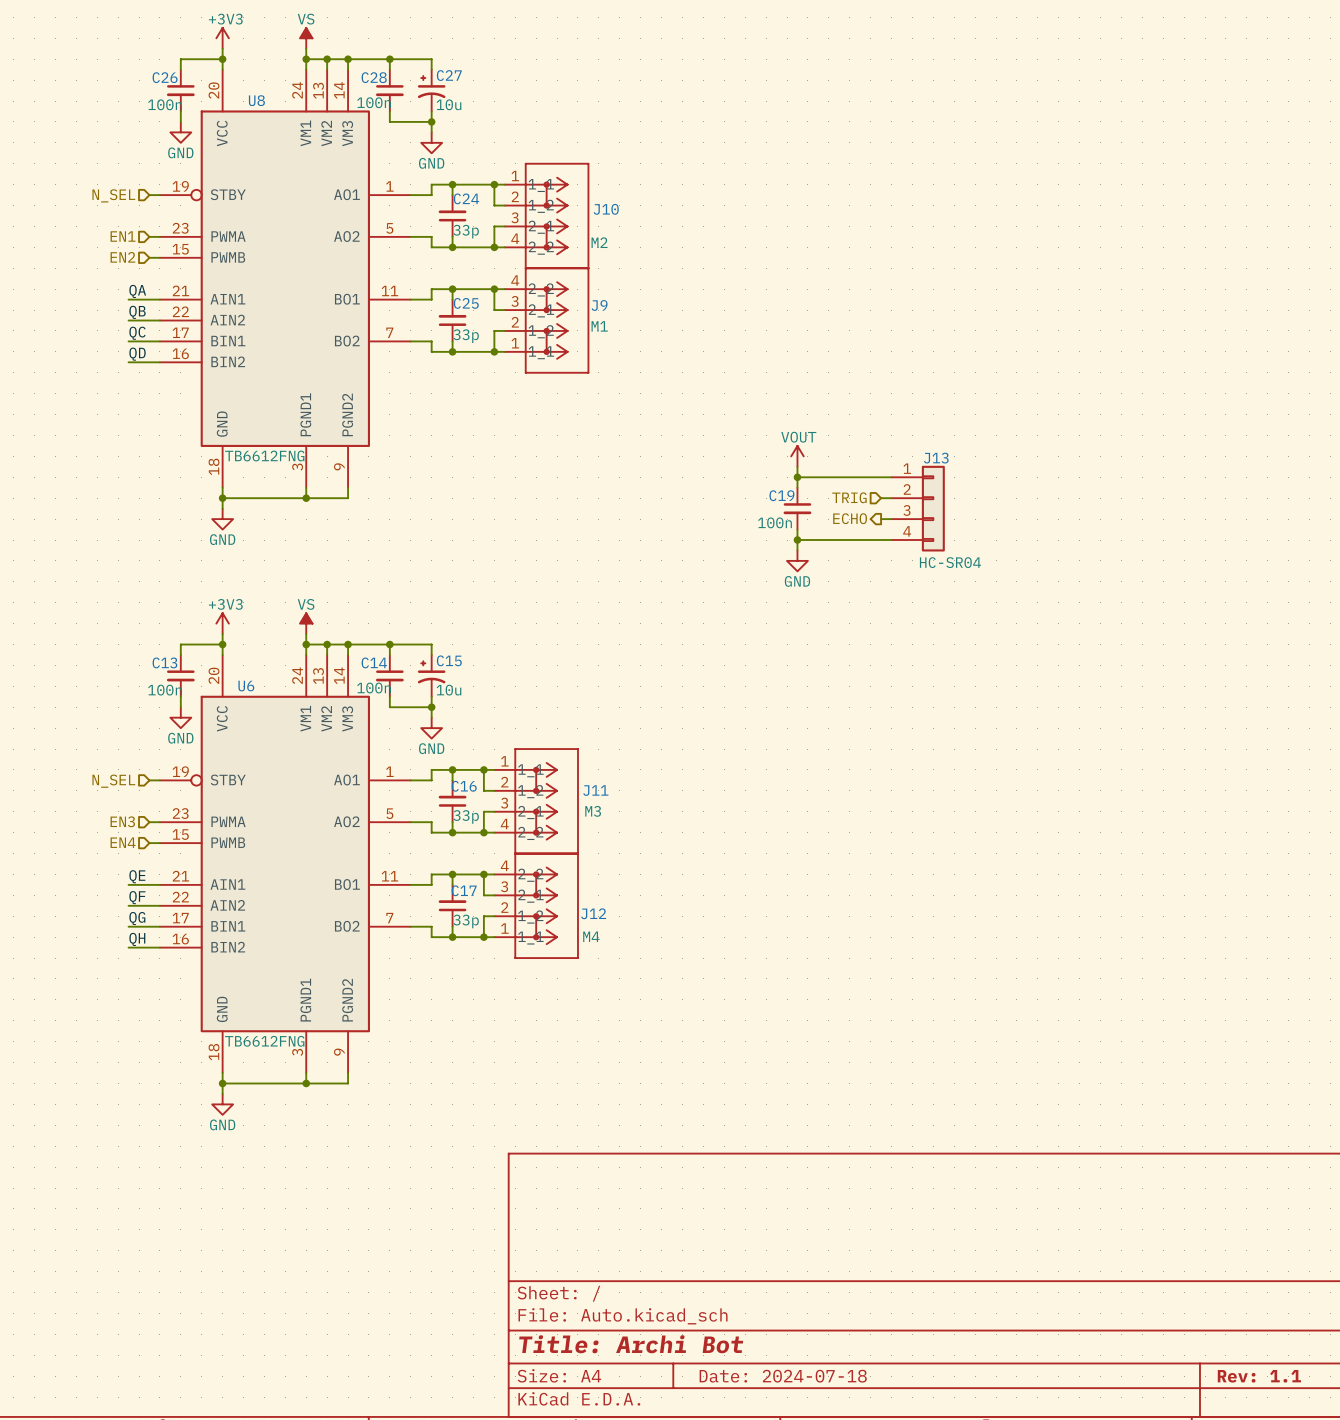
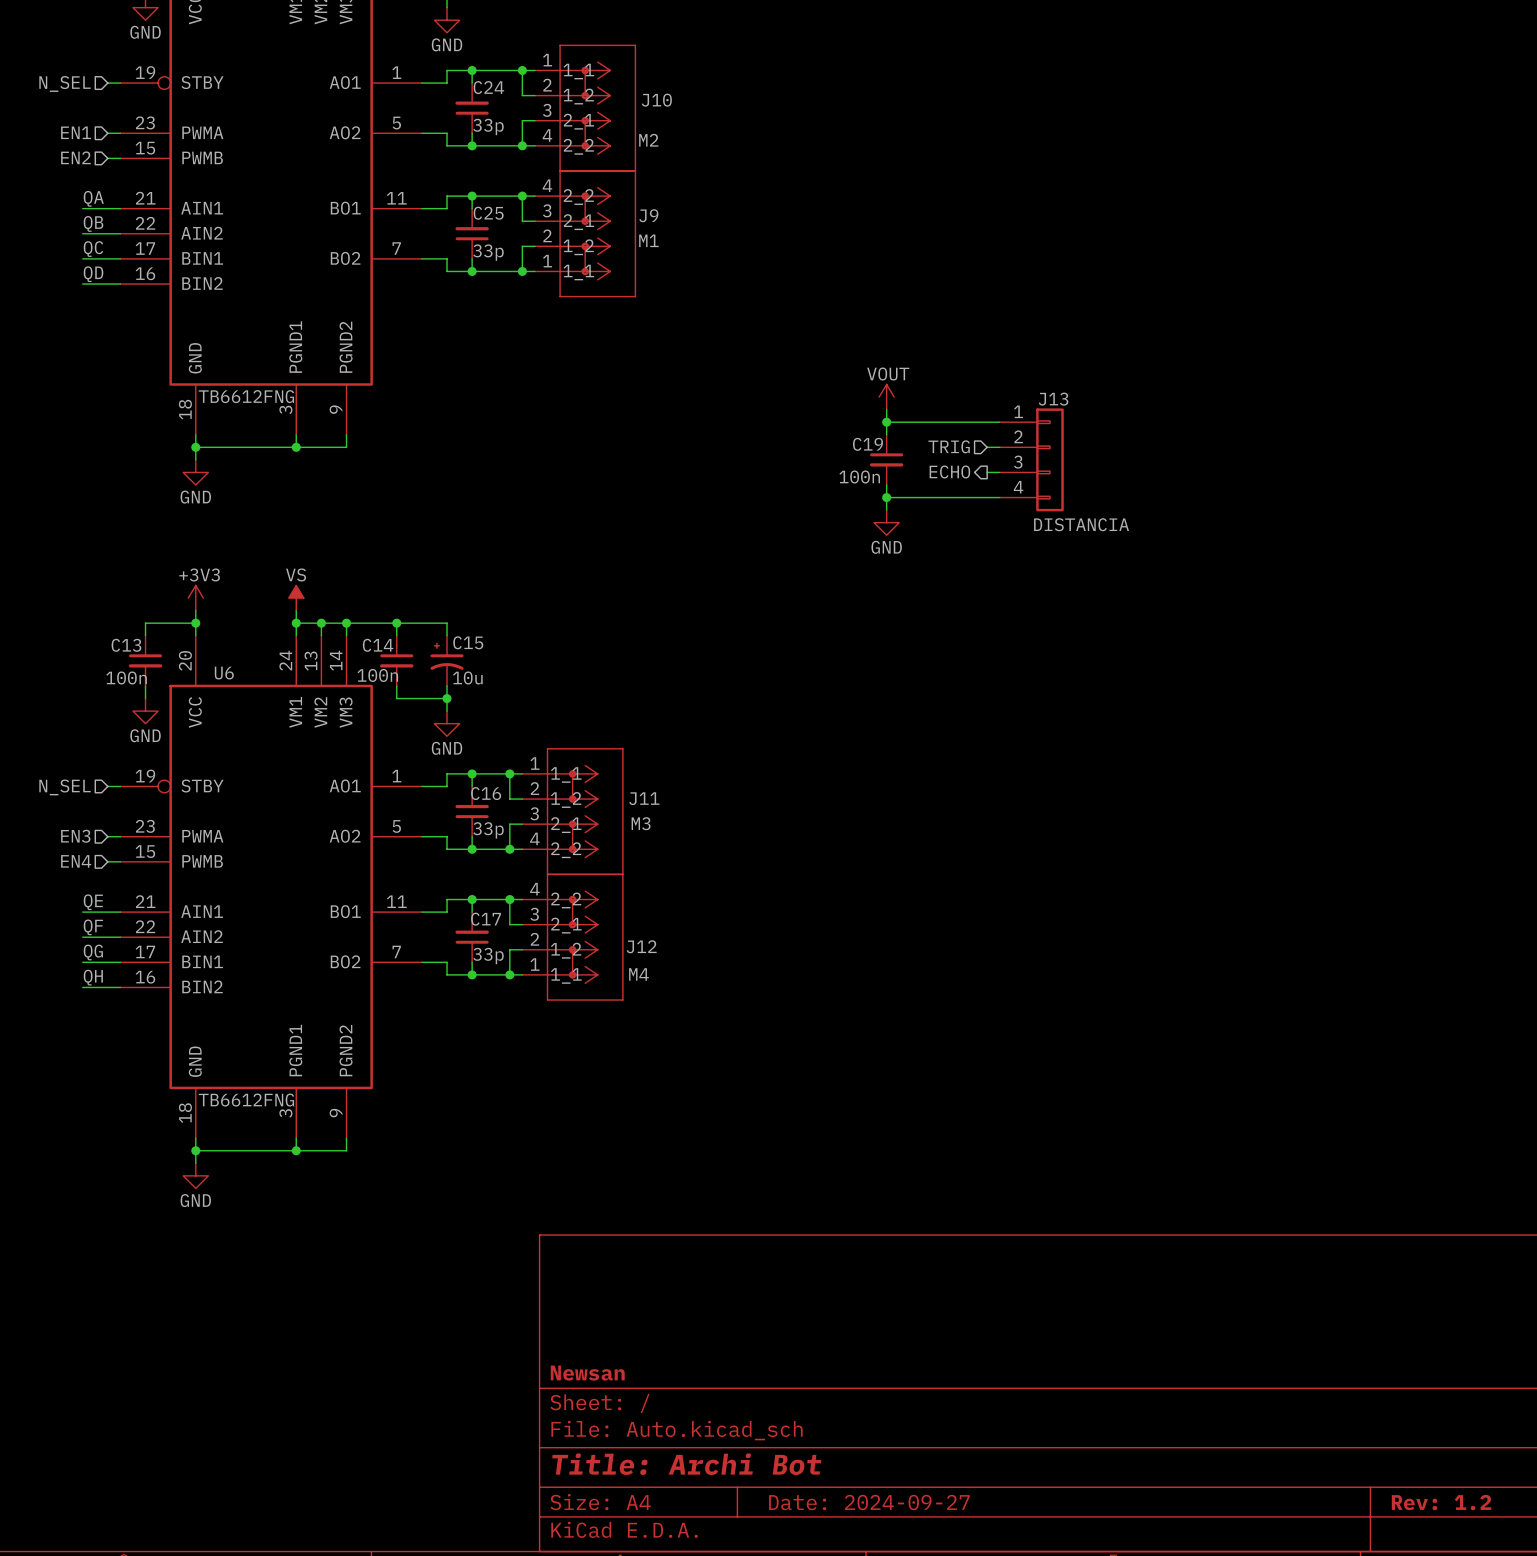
J13 value: HC-SR04 (950, 562) -> DISTANCIA (1081, 524)
title block: none -> Newsan (587, 1373)
title block: Date: 2024-07-18 (783, 1376) -> Date: 2024-09-27 (869, 1502)
title block: Rev: 1.1 (1259, 1376) -> Rev: 1.2 (1441, 1502)

